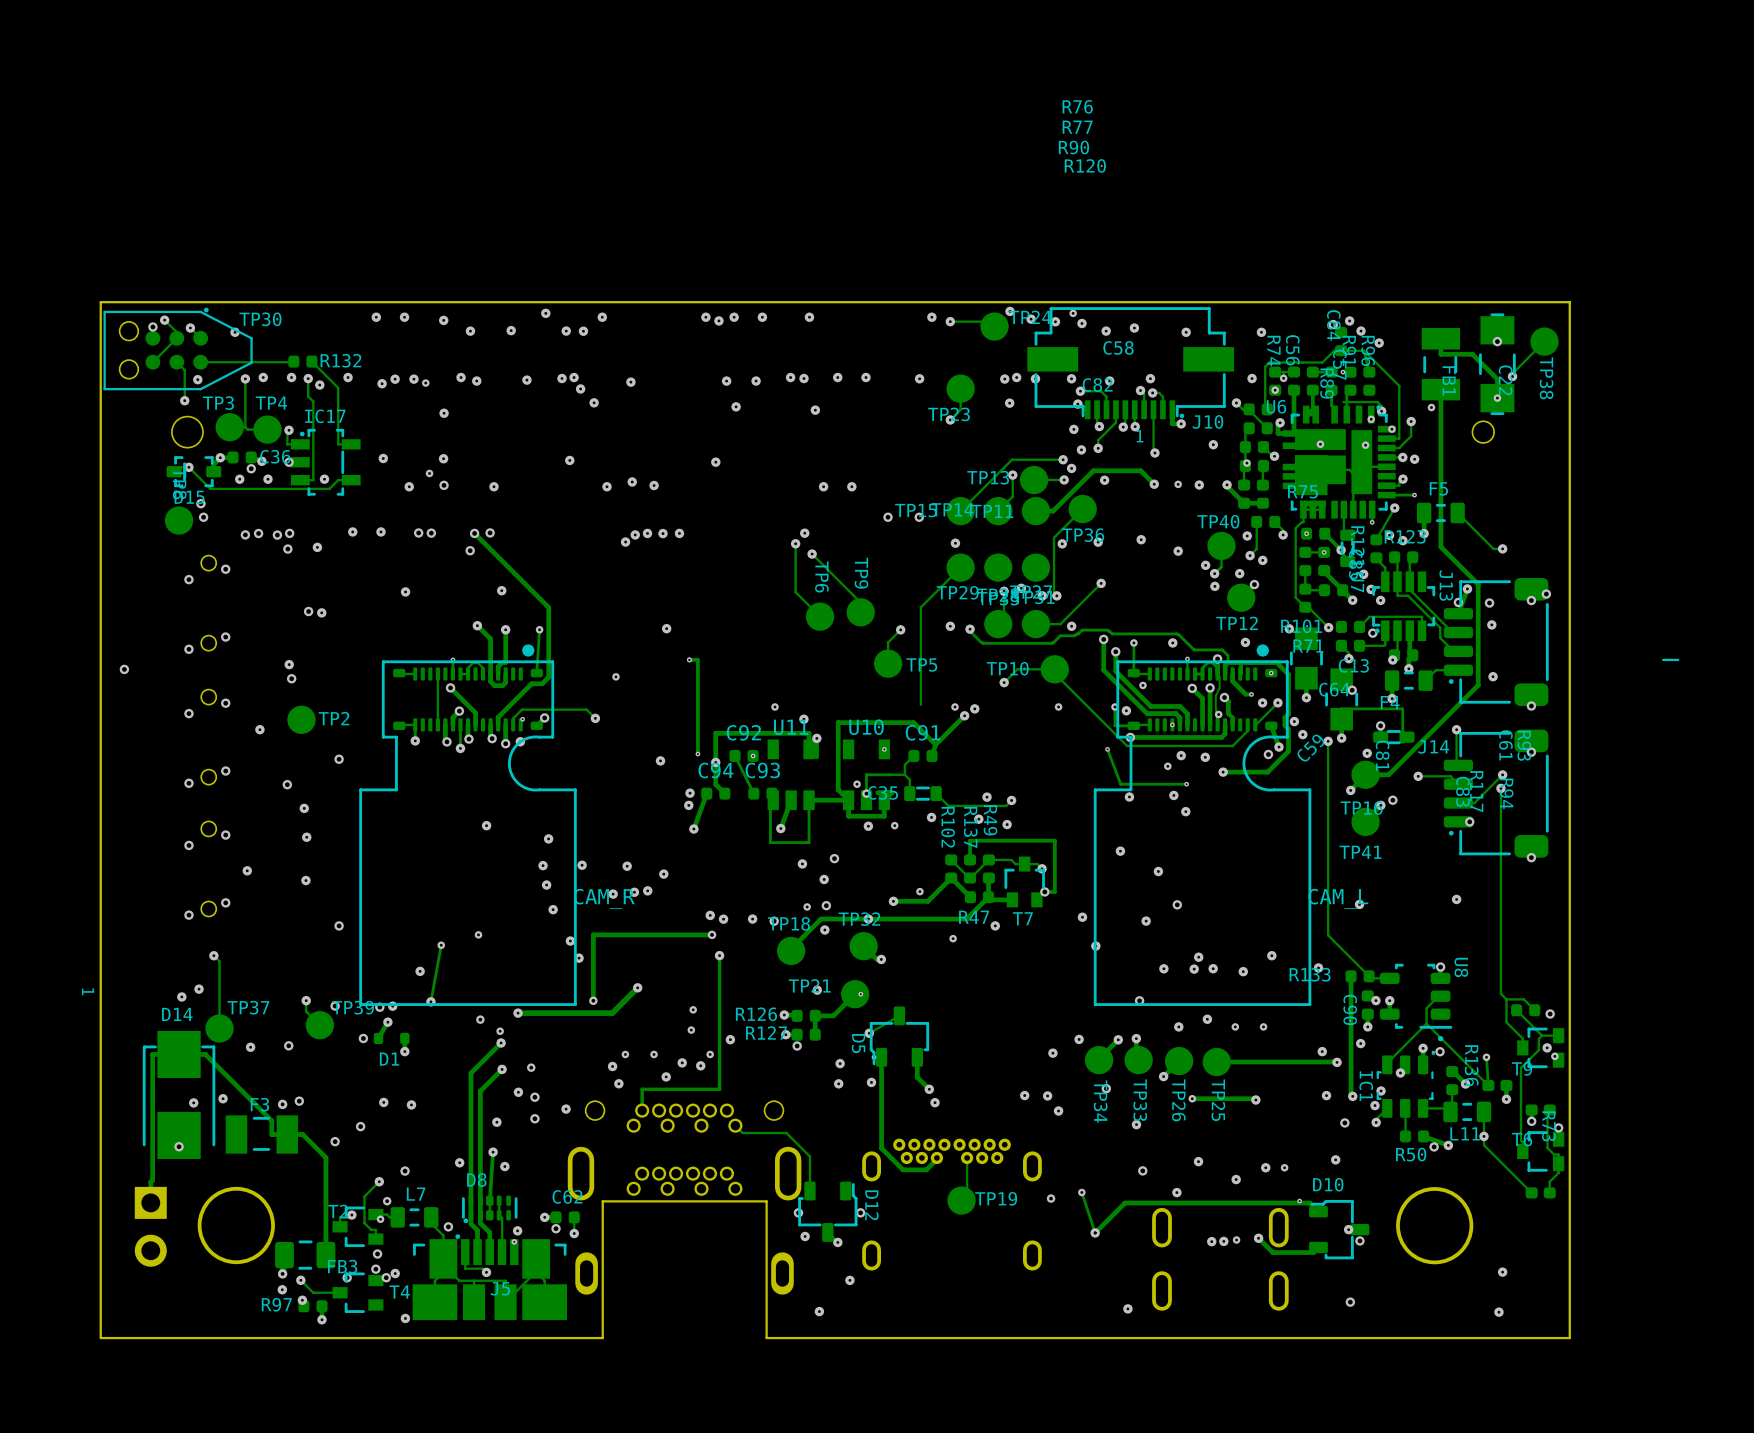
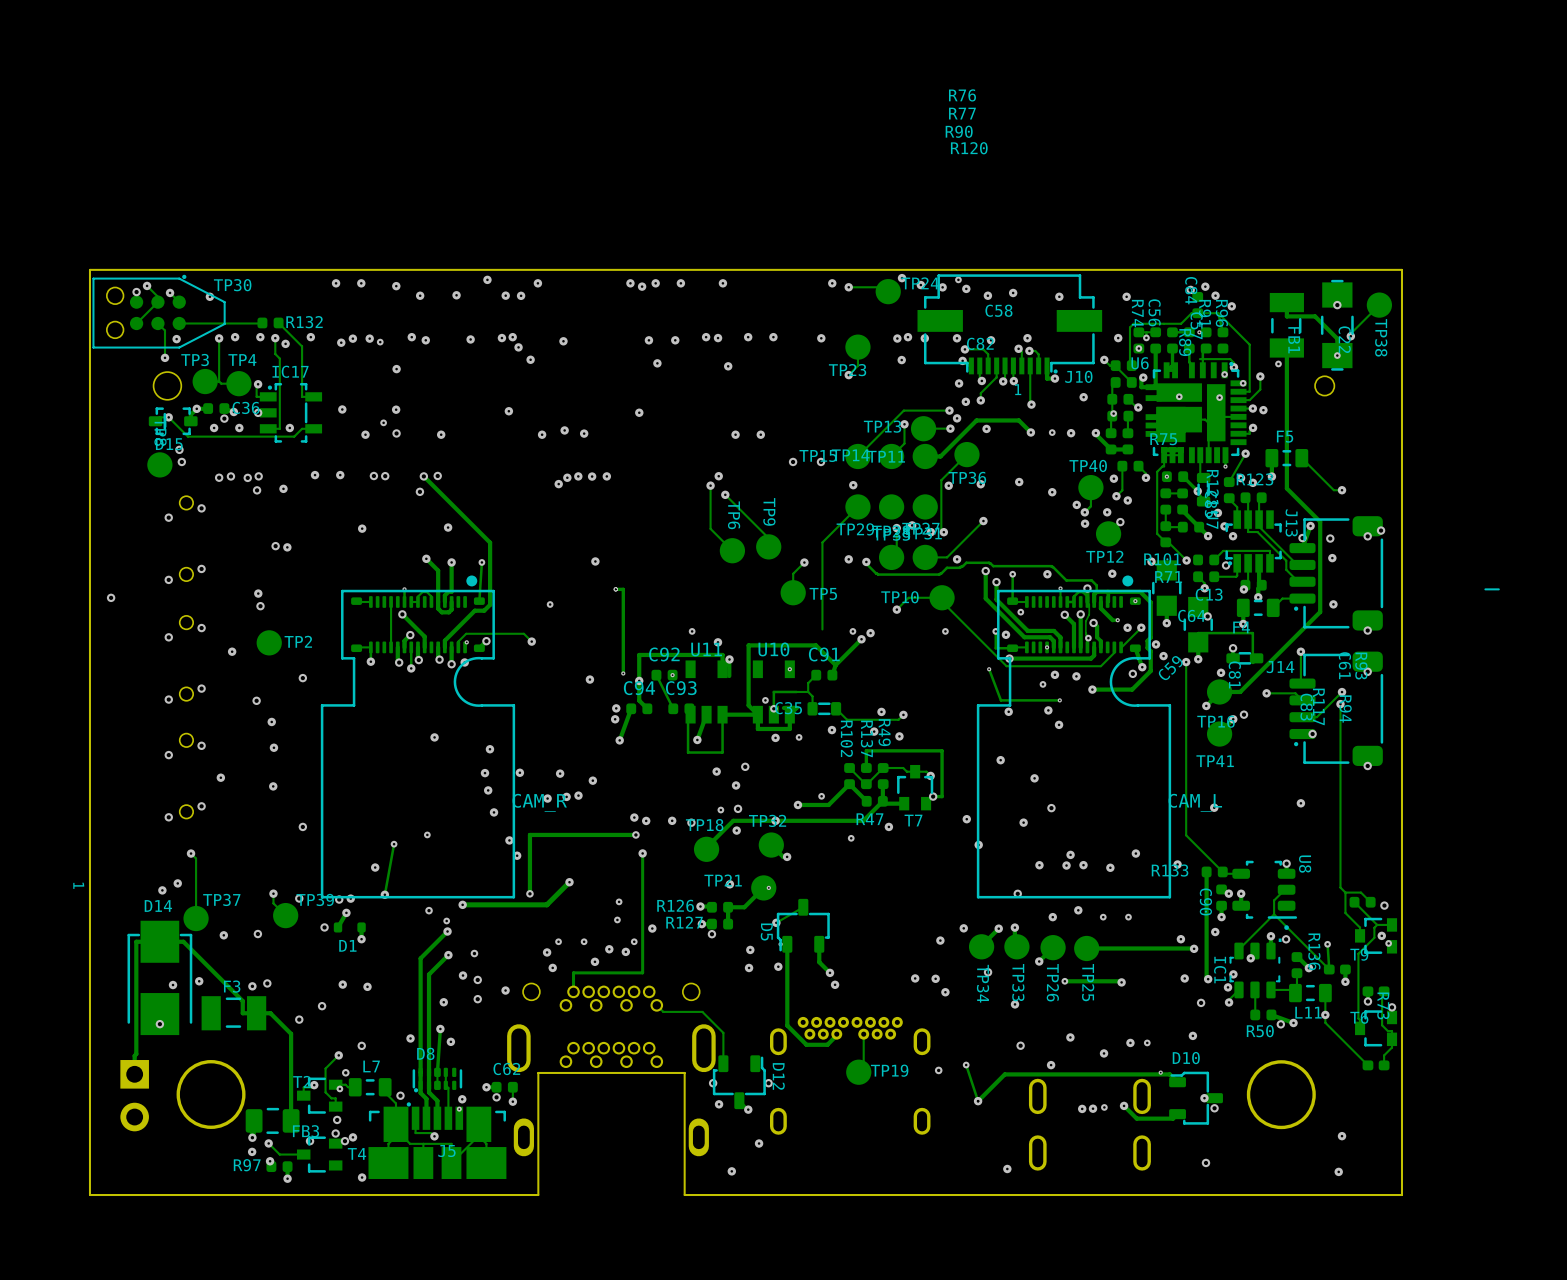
track: (1414, 495) (1386, 495) -> none
via: (1414, 495) -> none
via: (1324, 552) -> none

